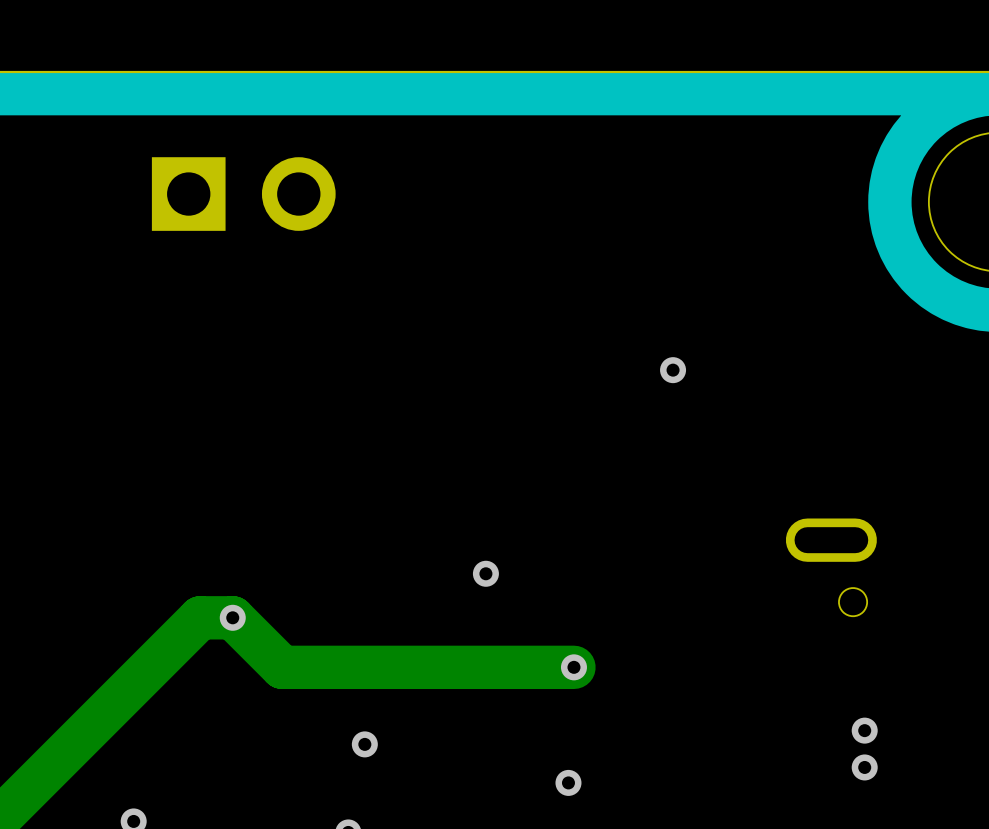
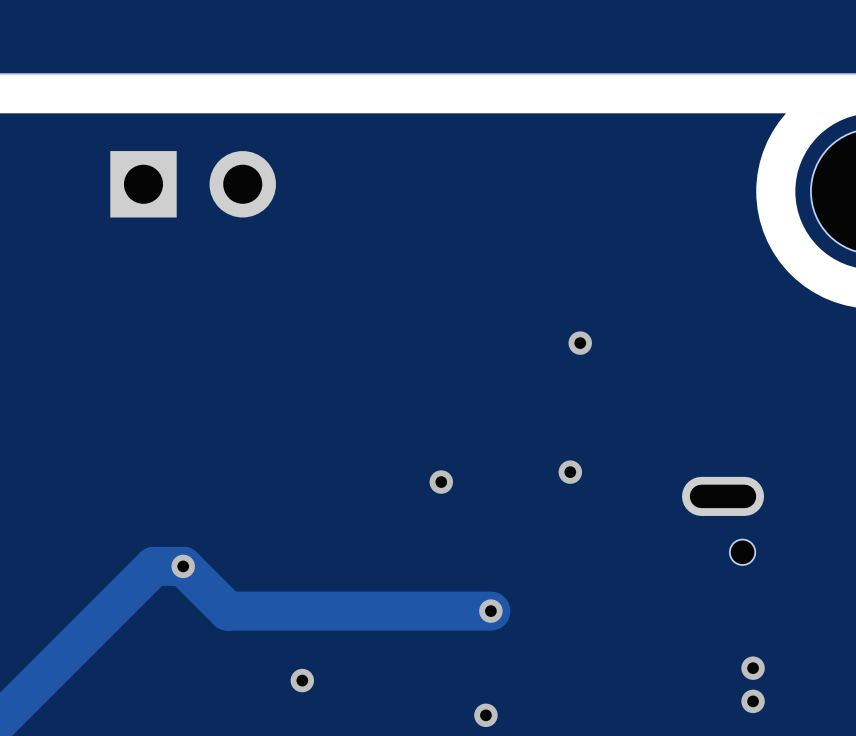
via: none -> (570, 472)
via position: (485, 573) -> (441, 482)

